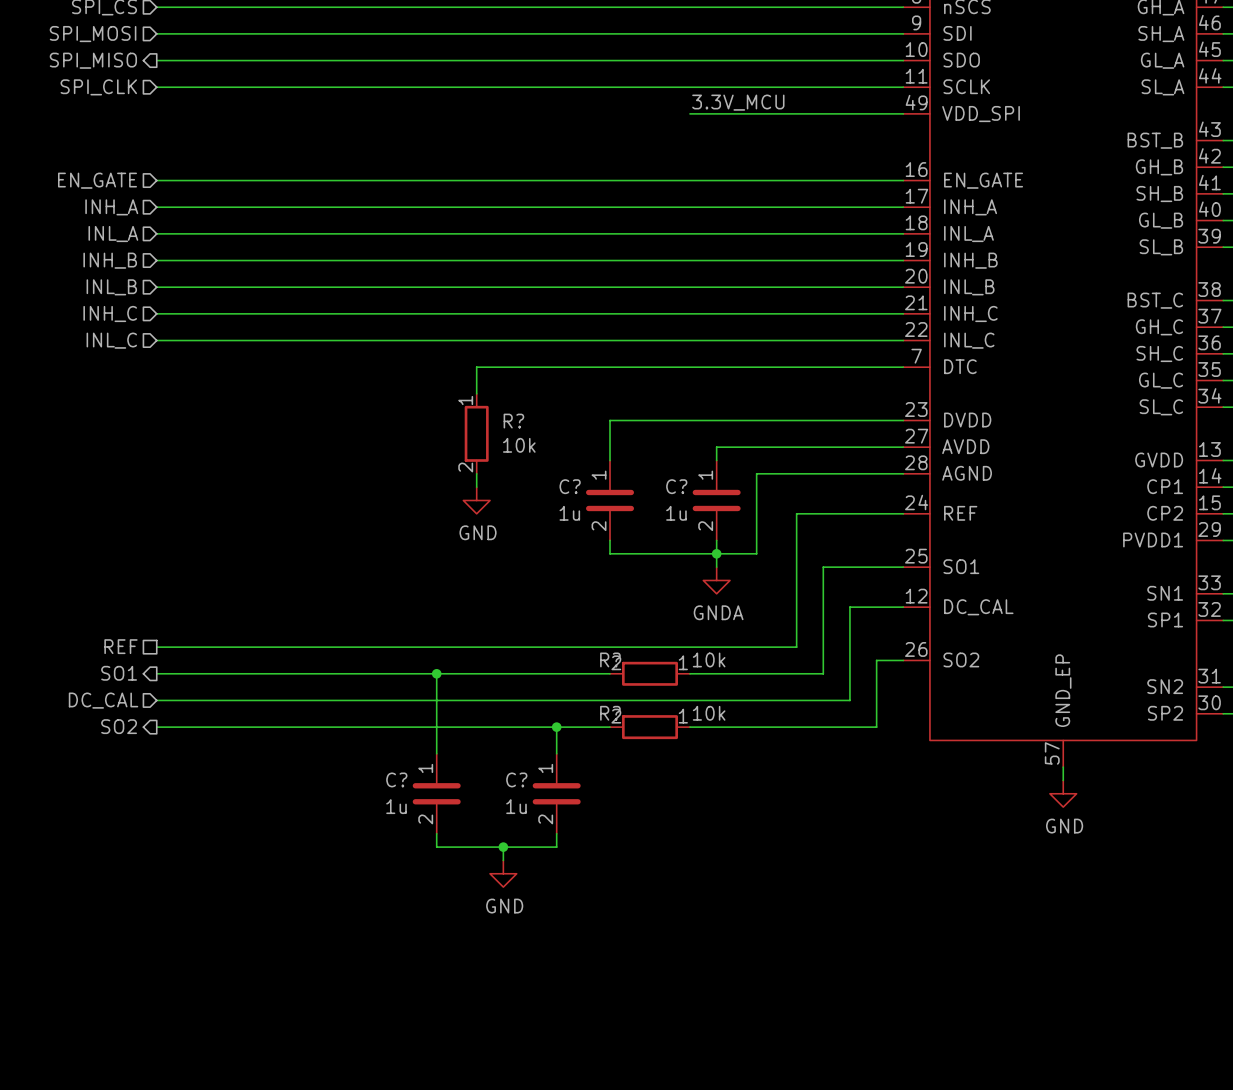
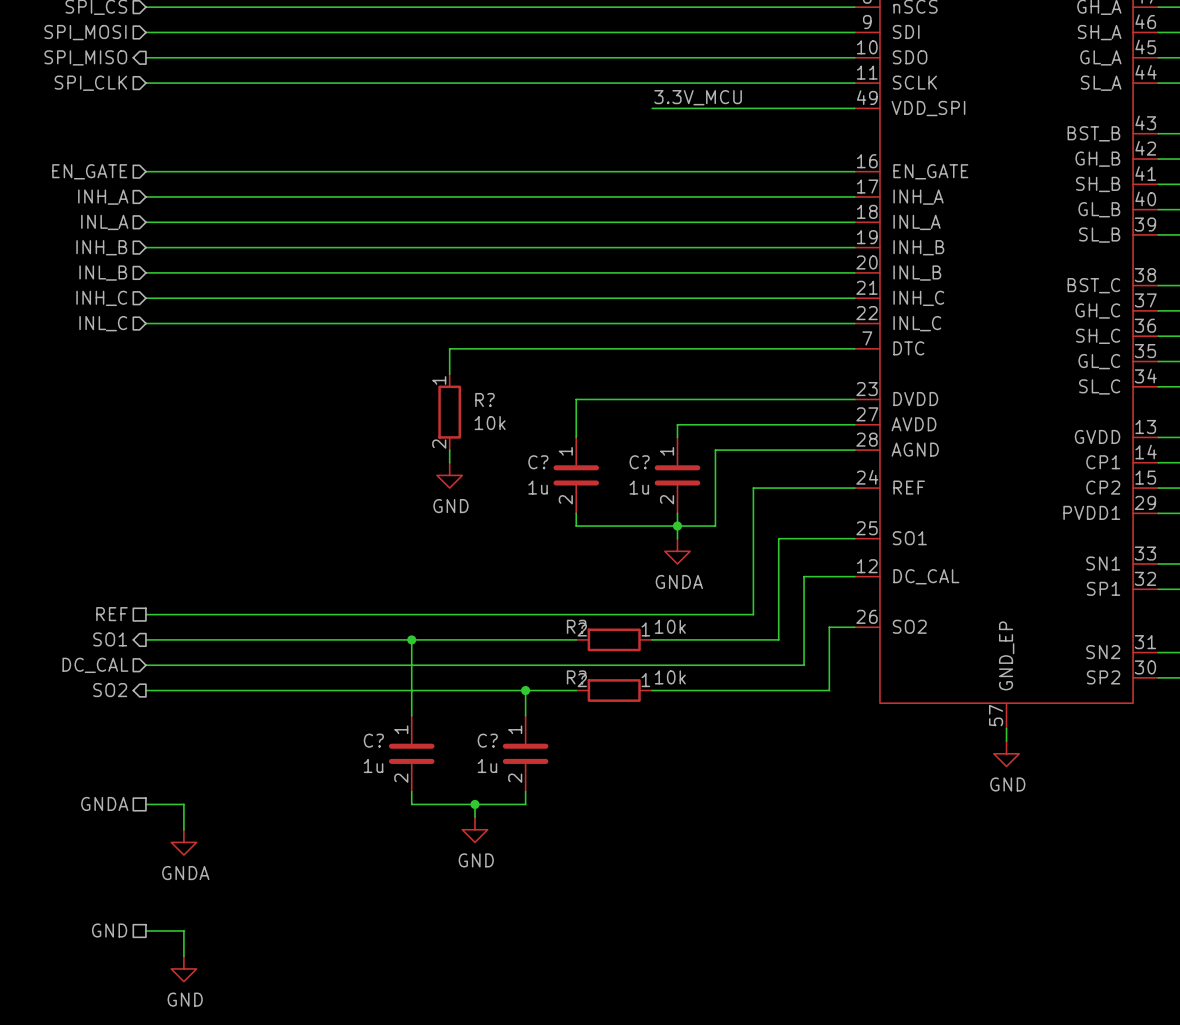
hierarchical label: none -> GNDA (104, 803)
wire: none -> (145, 804) (183, 804) (183, 829)
power symbol: none -> GNDA (183, 842)
hierarchical label: none -> GND (109, 930)
wire: none -> (145, 930) (183, 930) (183, 956)
power symbol: none -> GND (183, 968)

